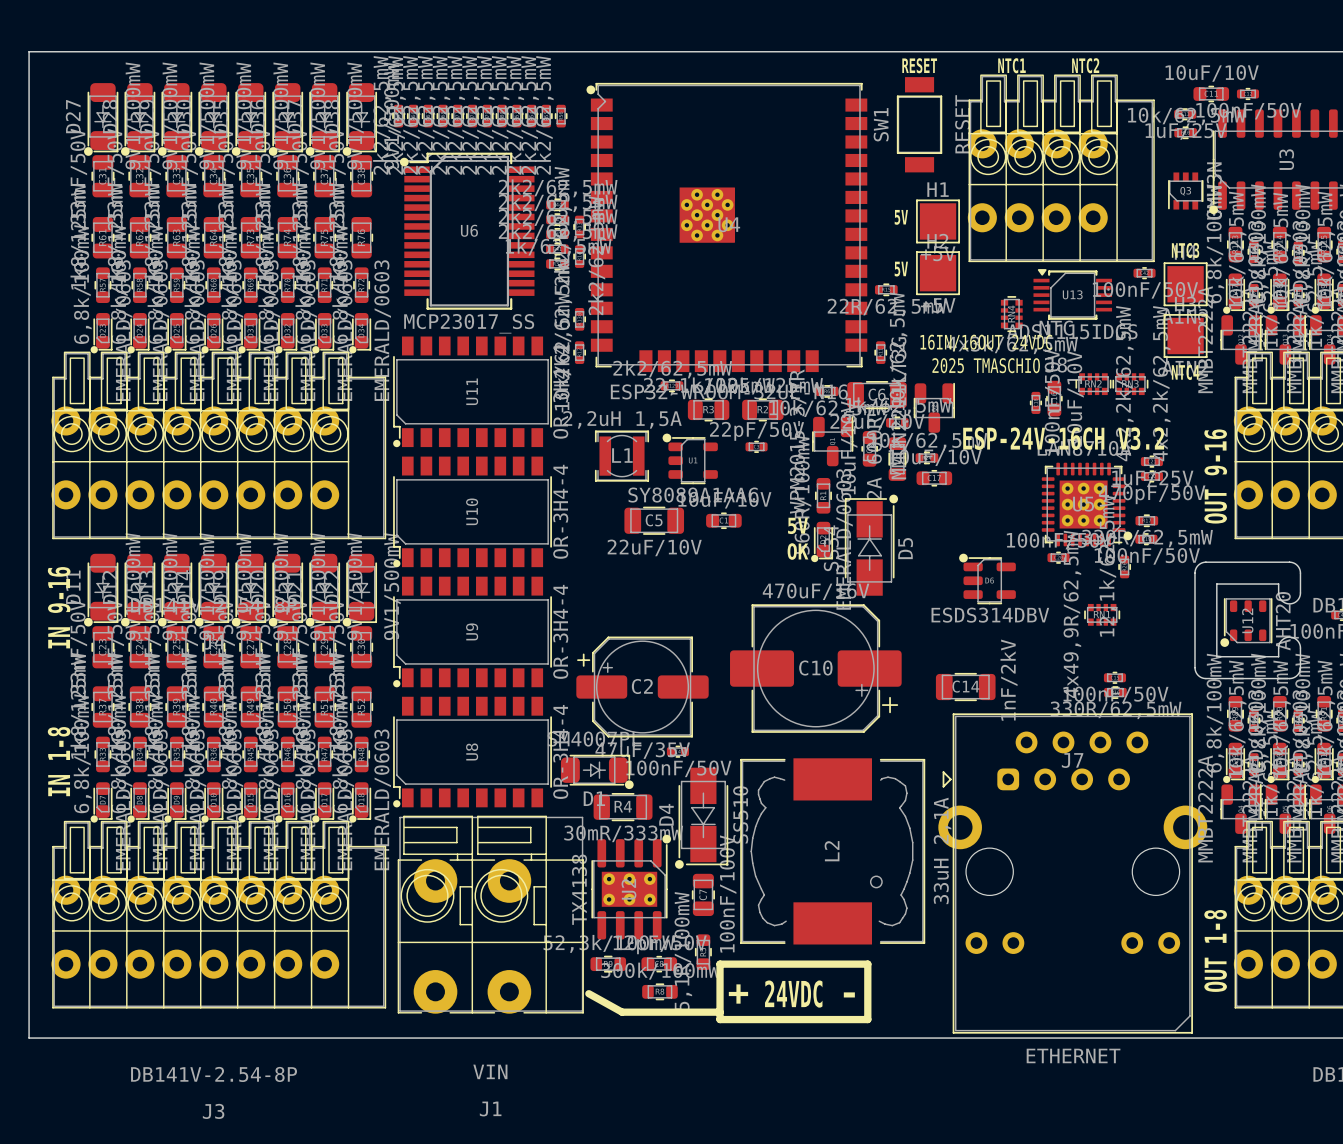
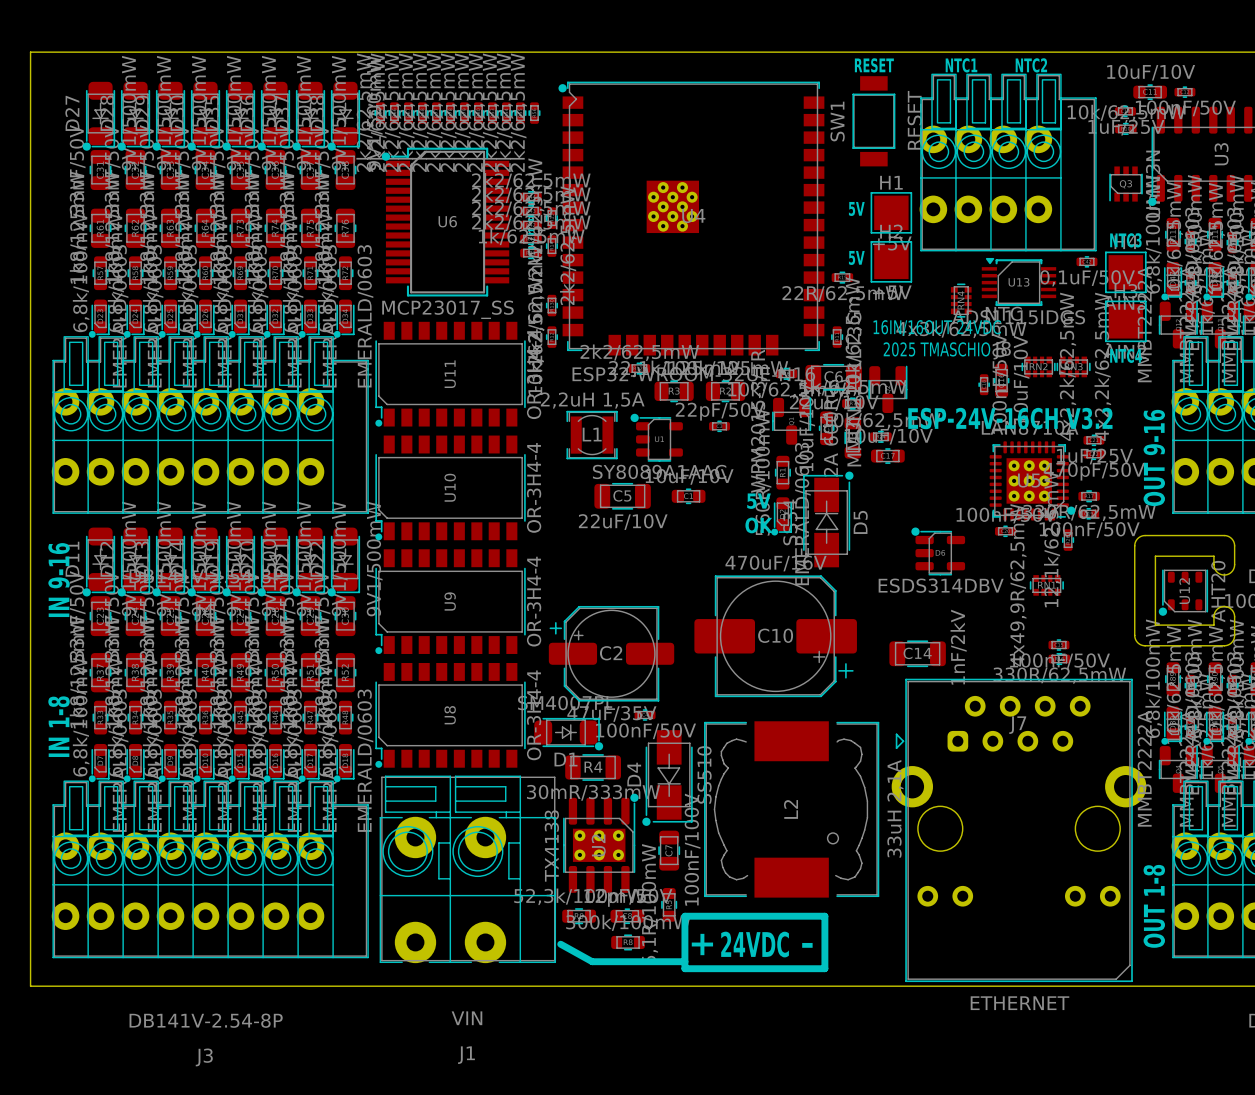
part value: 100nF/50V (1145, 290) -> 0,1uF/50V (1087, 278)

